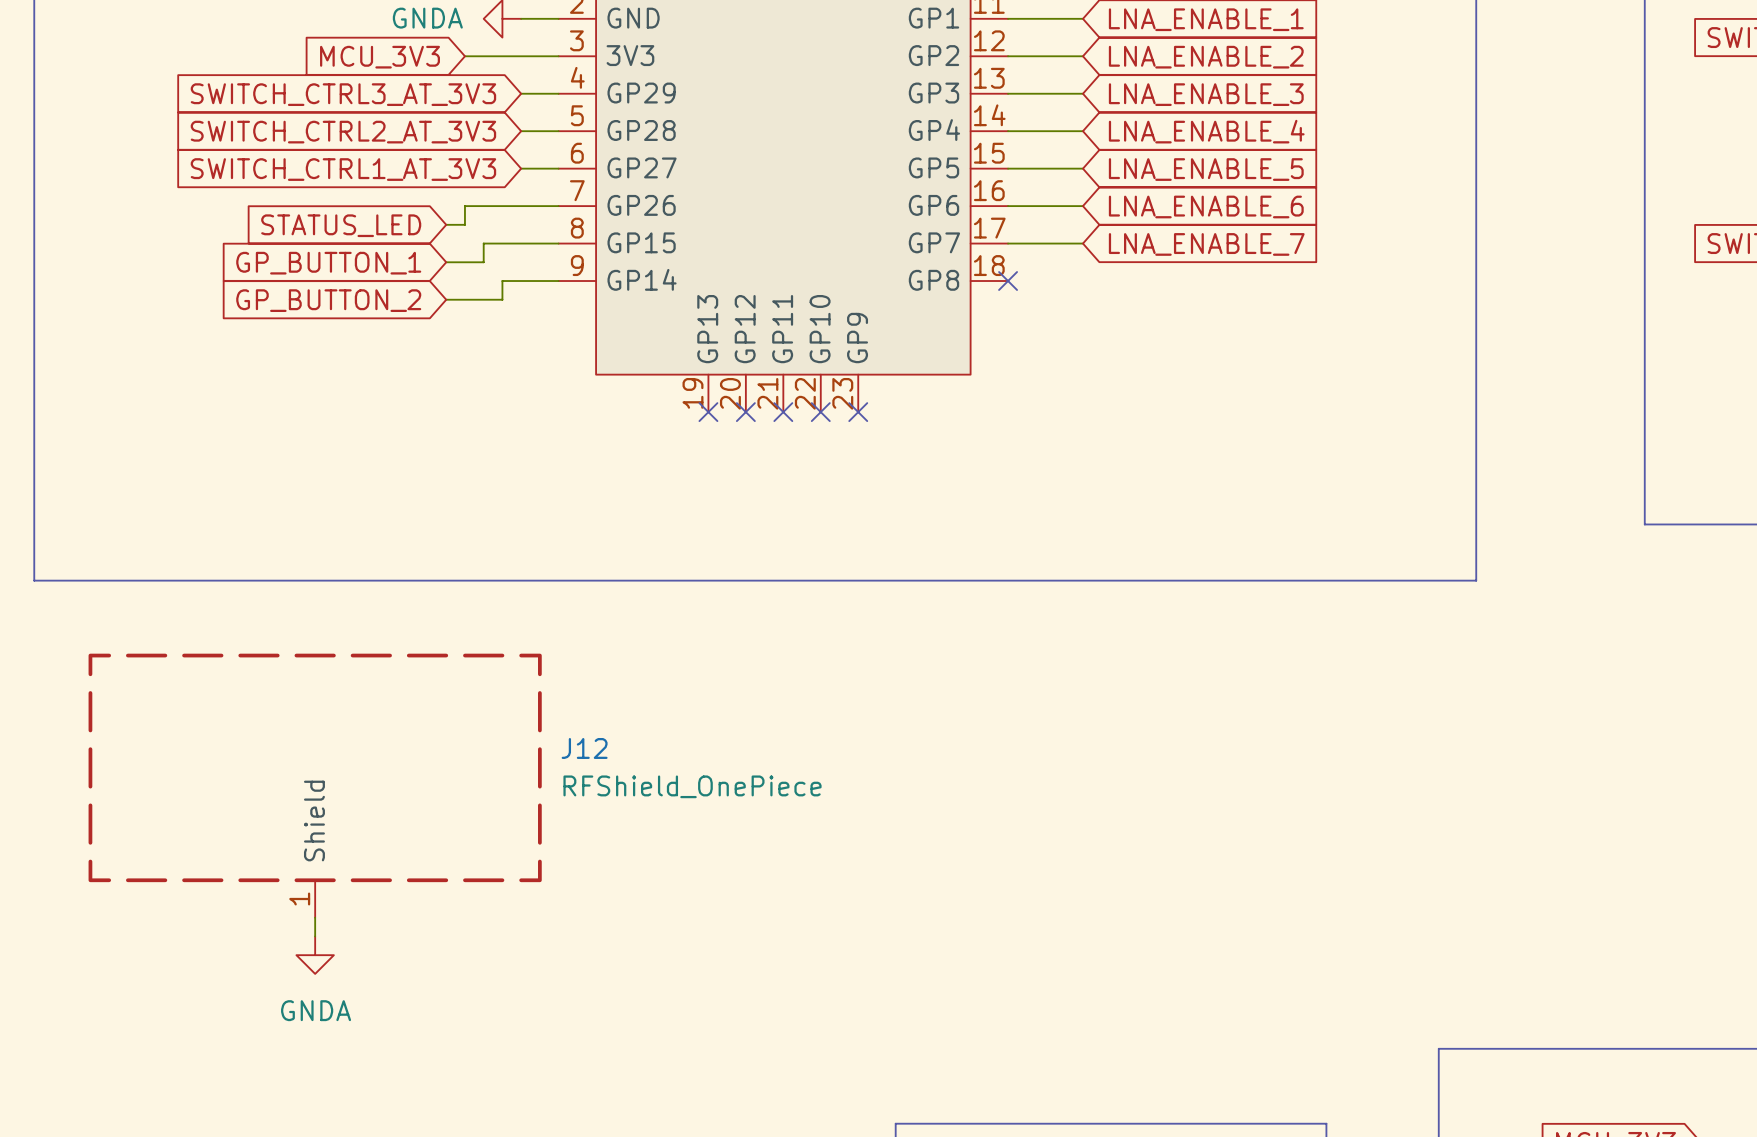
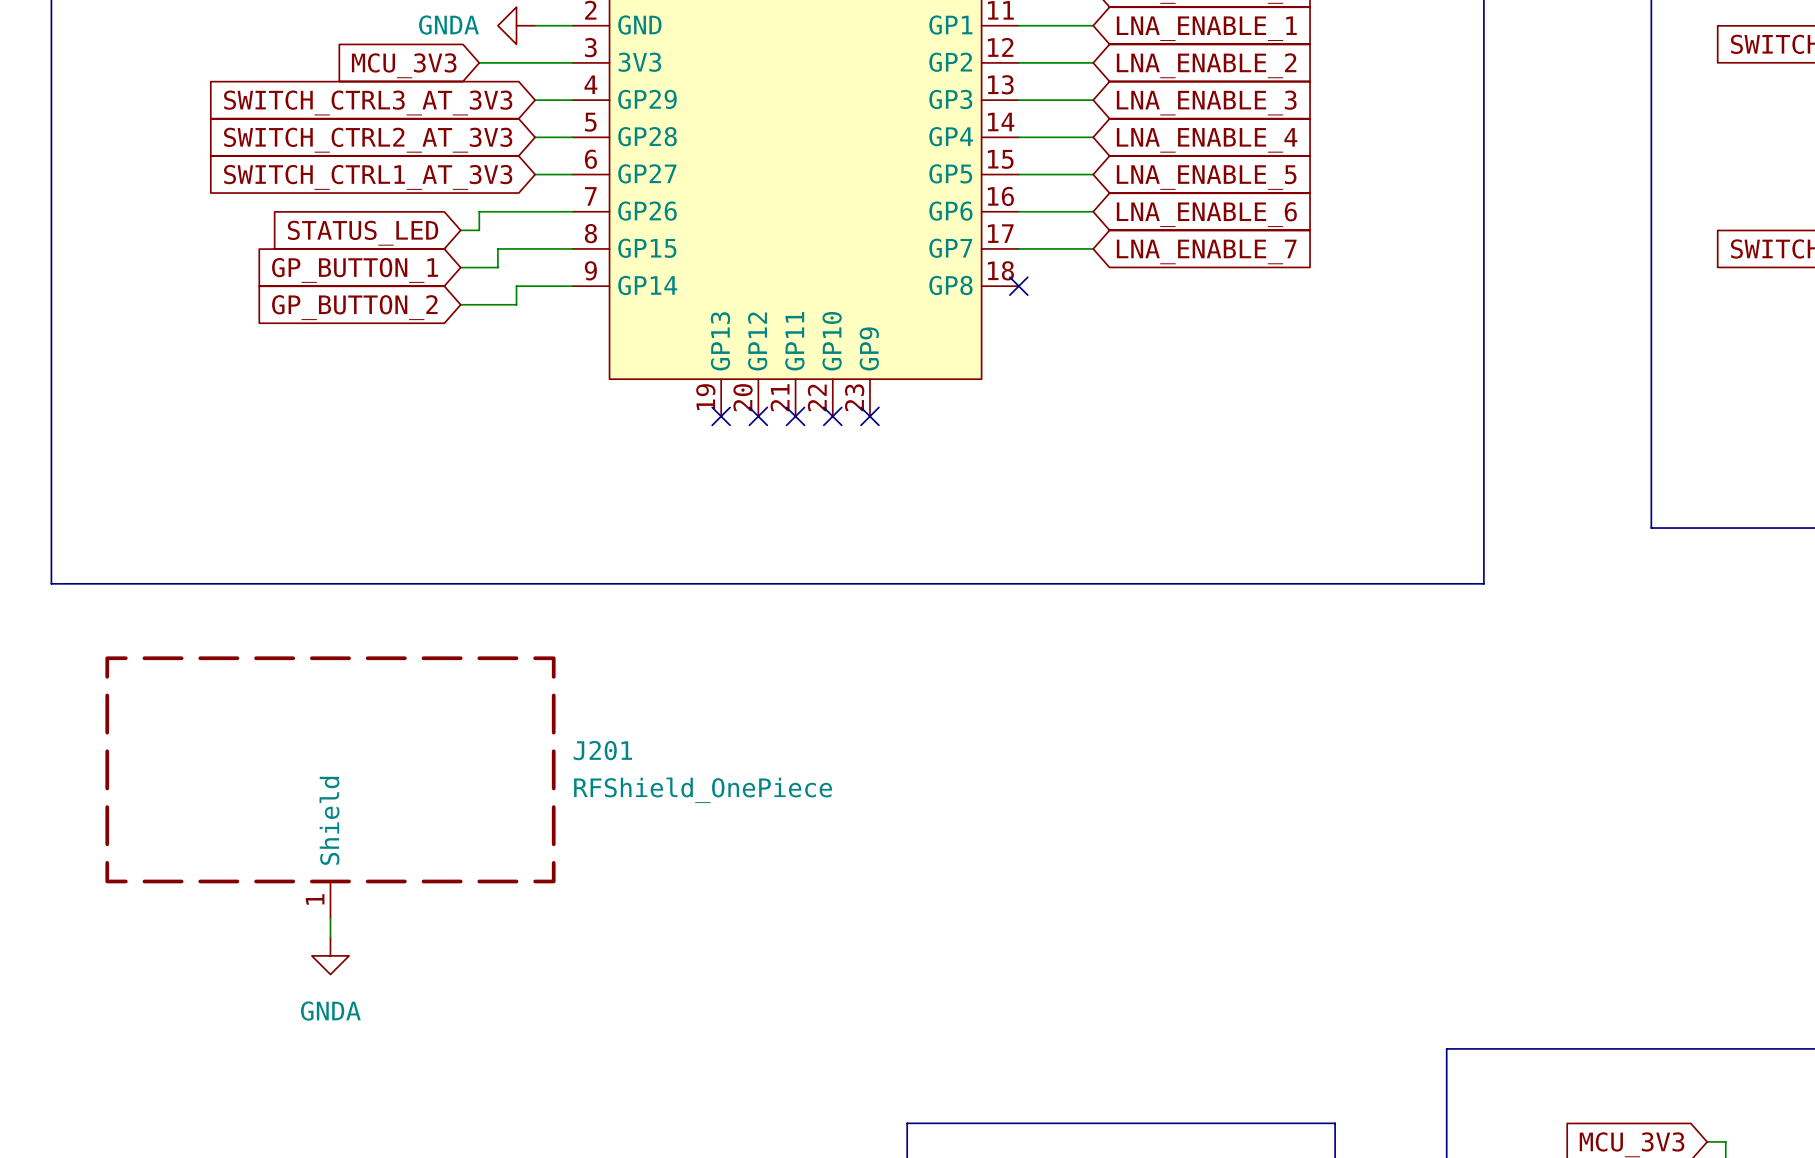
J12 name: J12 (584, 748) -> J201 (602, 750)

